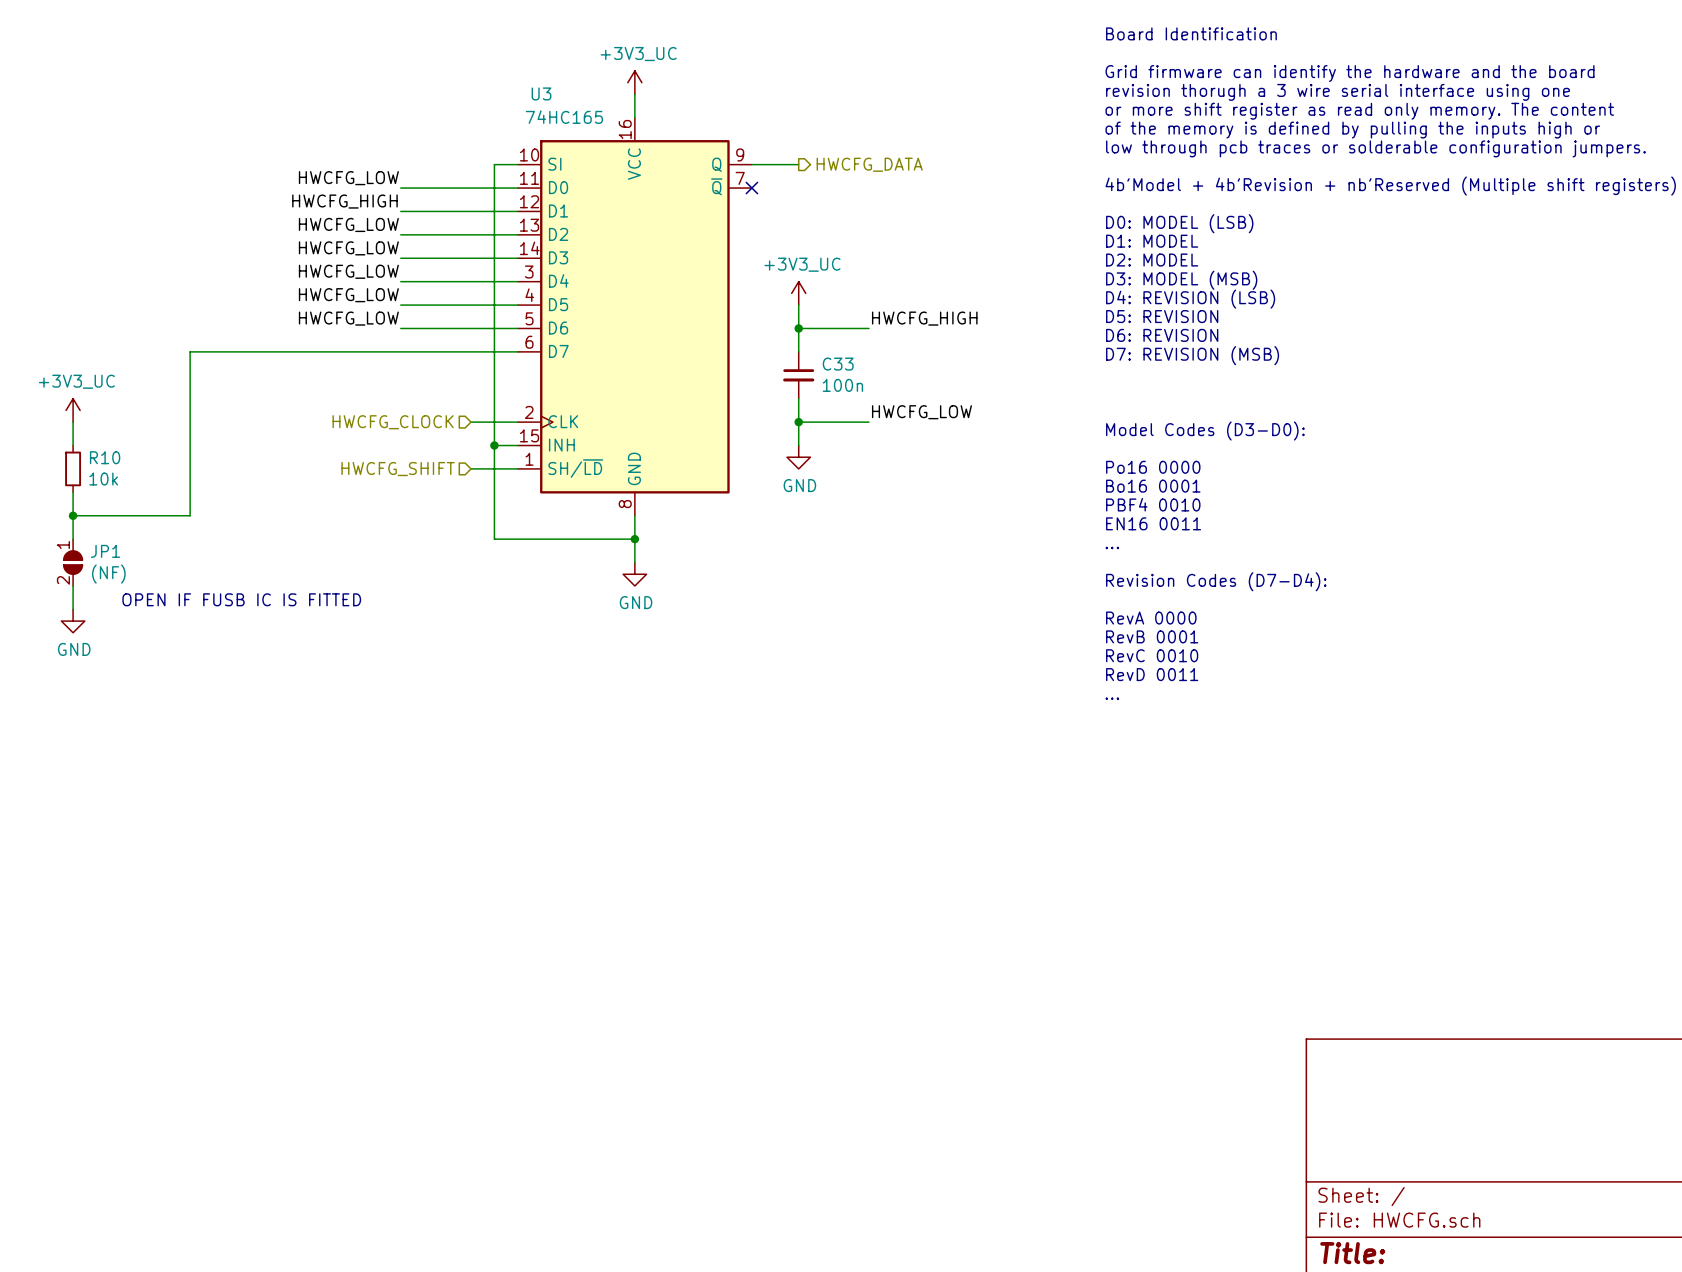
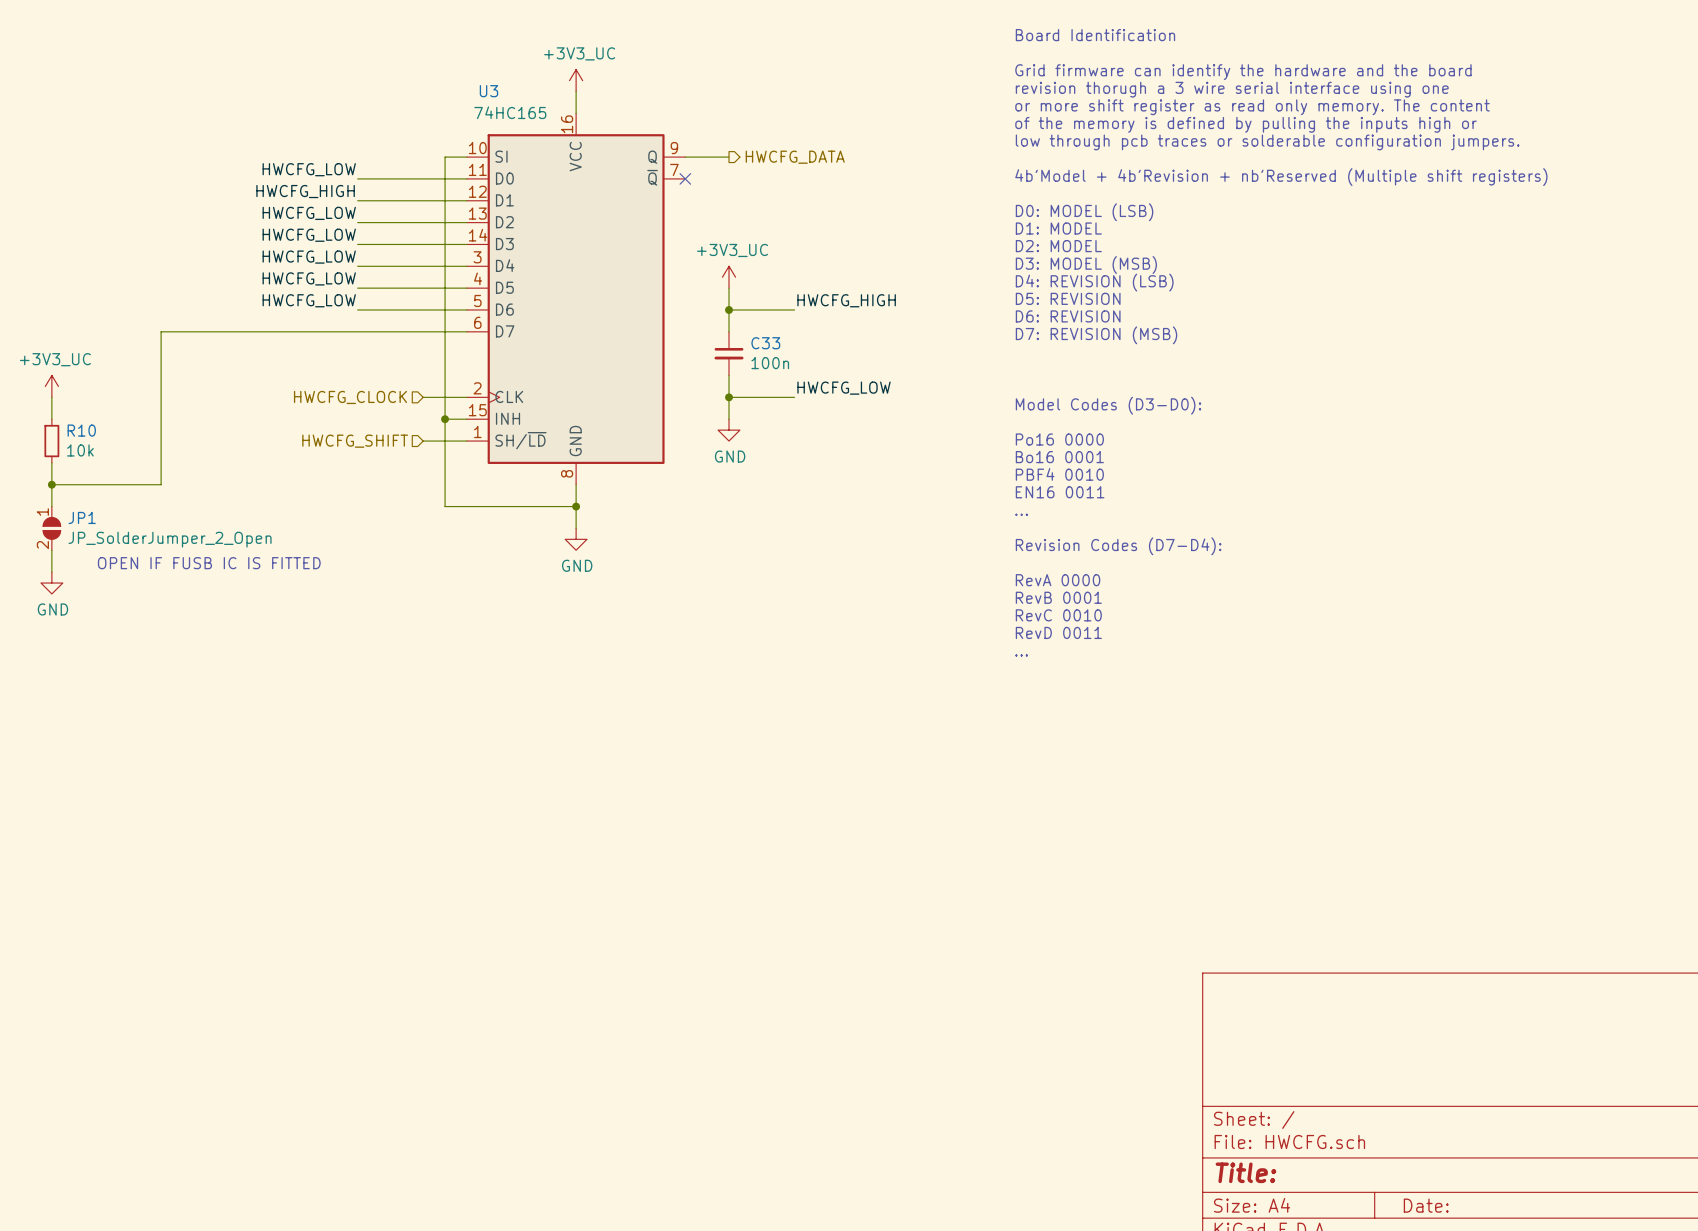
JP1 value: (NF) (108, 574) -> JP_SolderJumper_2_Open (170, 539)

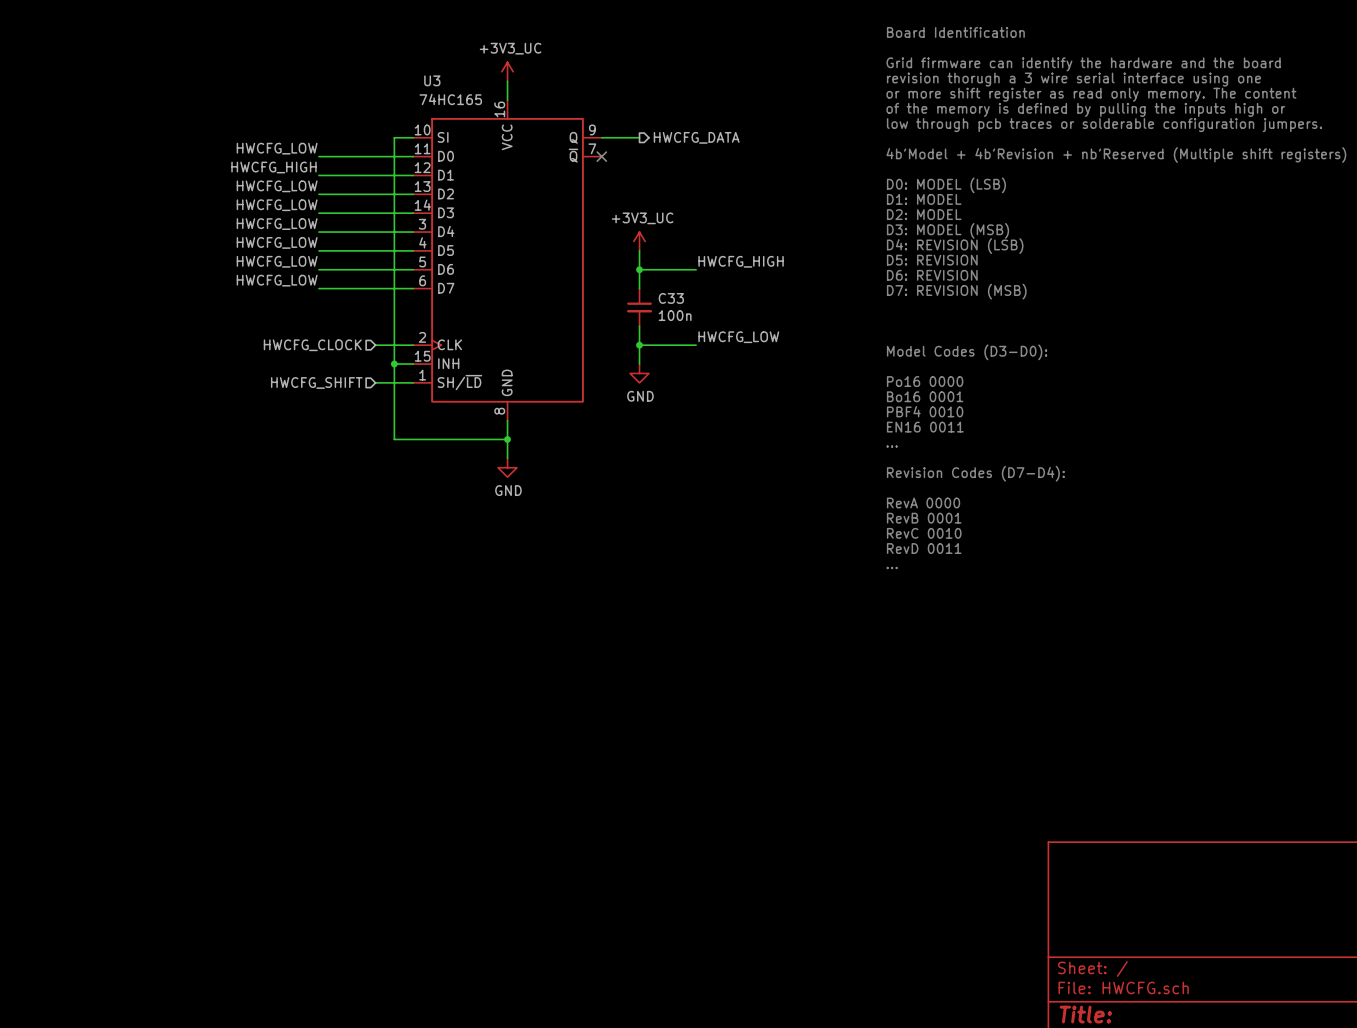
label: none -> HWCFG_LOW (277, 280)
wire: (357, 331) (161, 331) (161, 484) (51, 484) -> none
power symbol: +3V3_UC (51, 386) -> none
wire: (51, 397) (51, 419) -> none
R10: 10k (51, 441) -> none
wire: (51, 462) (51, 506) -> none
junction: (51, 484) -> none
JP1: JP_SolderJumper_2_Open (51, 528) -> none
wire: (51, 550) (51, 572) -> none
text: OPEN IF FUSB IC IS FITTED (209, 563) -> none
power symbol: GND (51, 583) -> none

